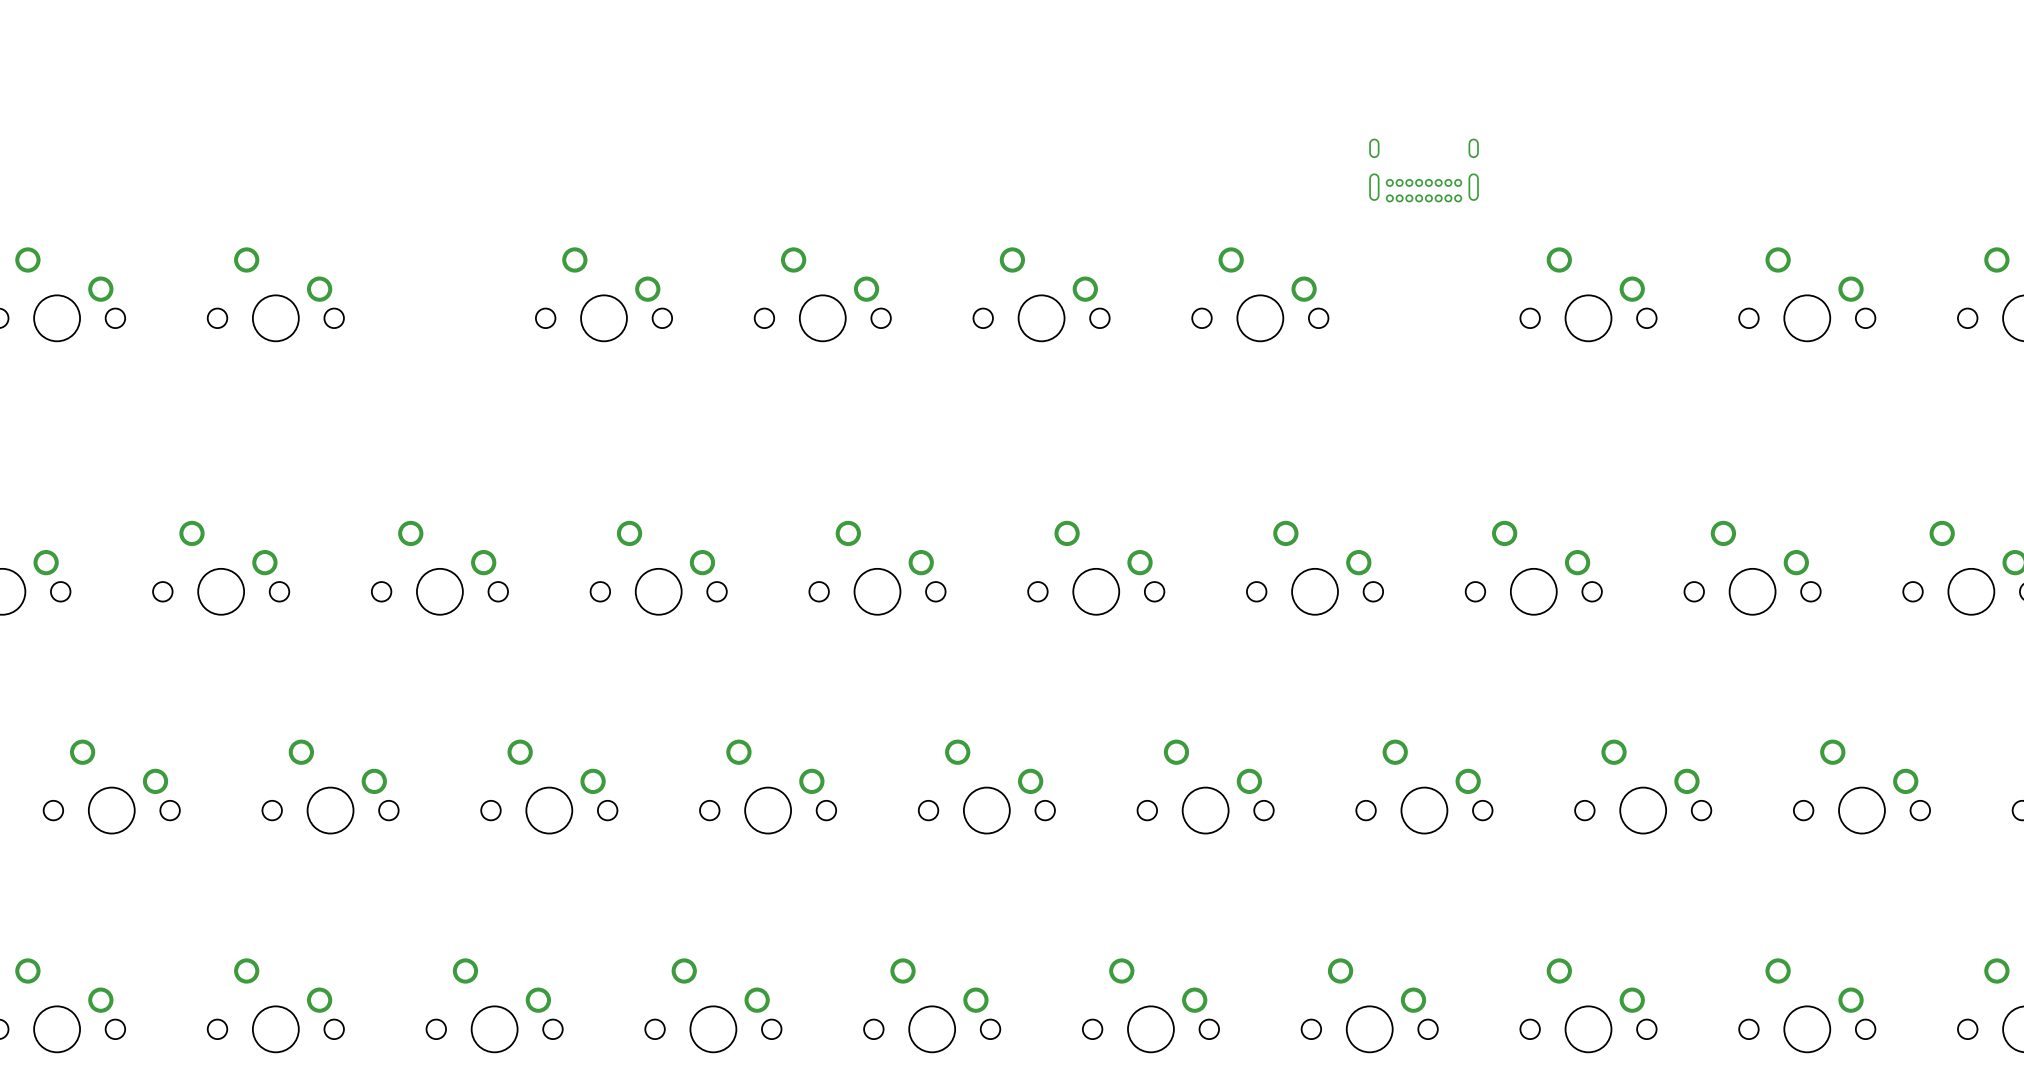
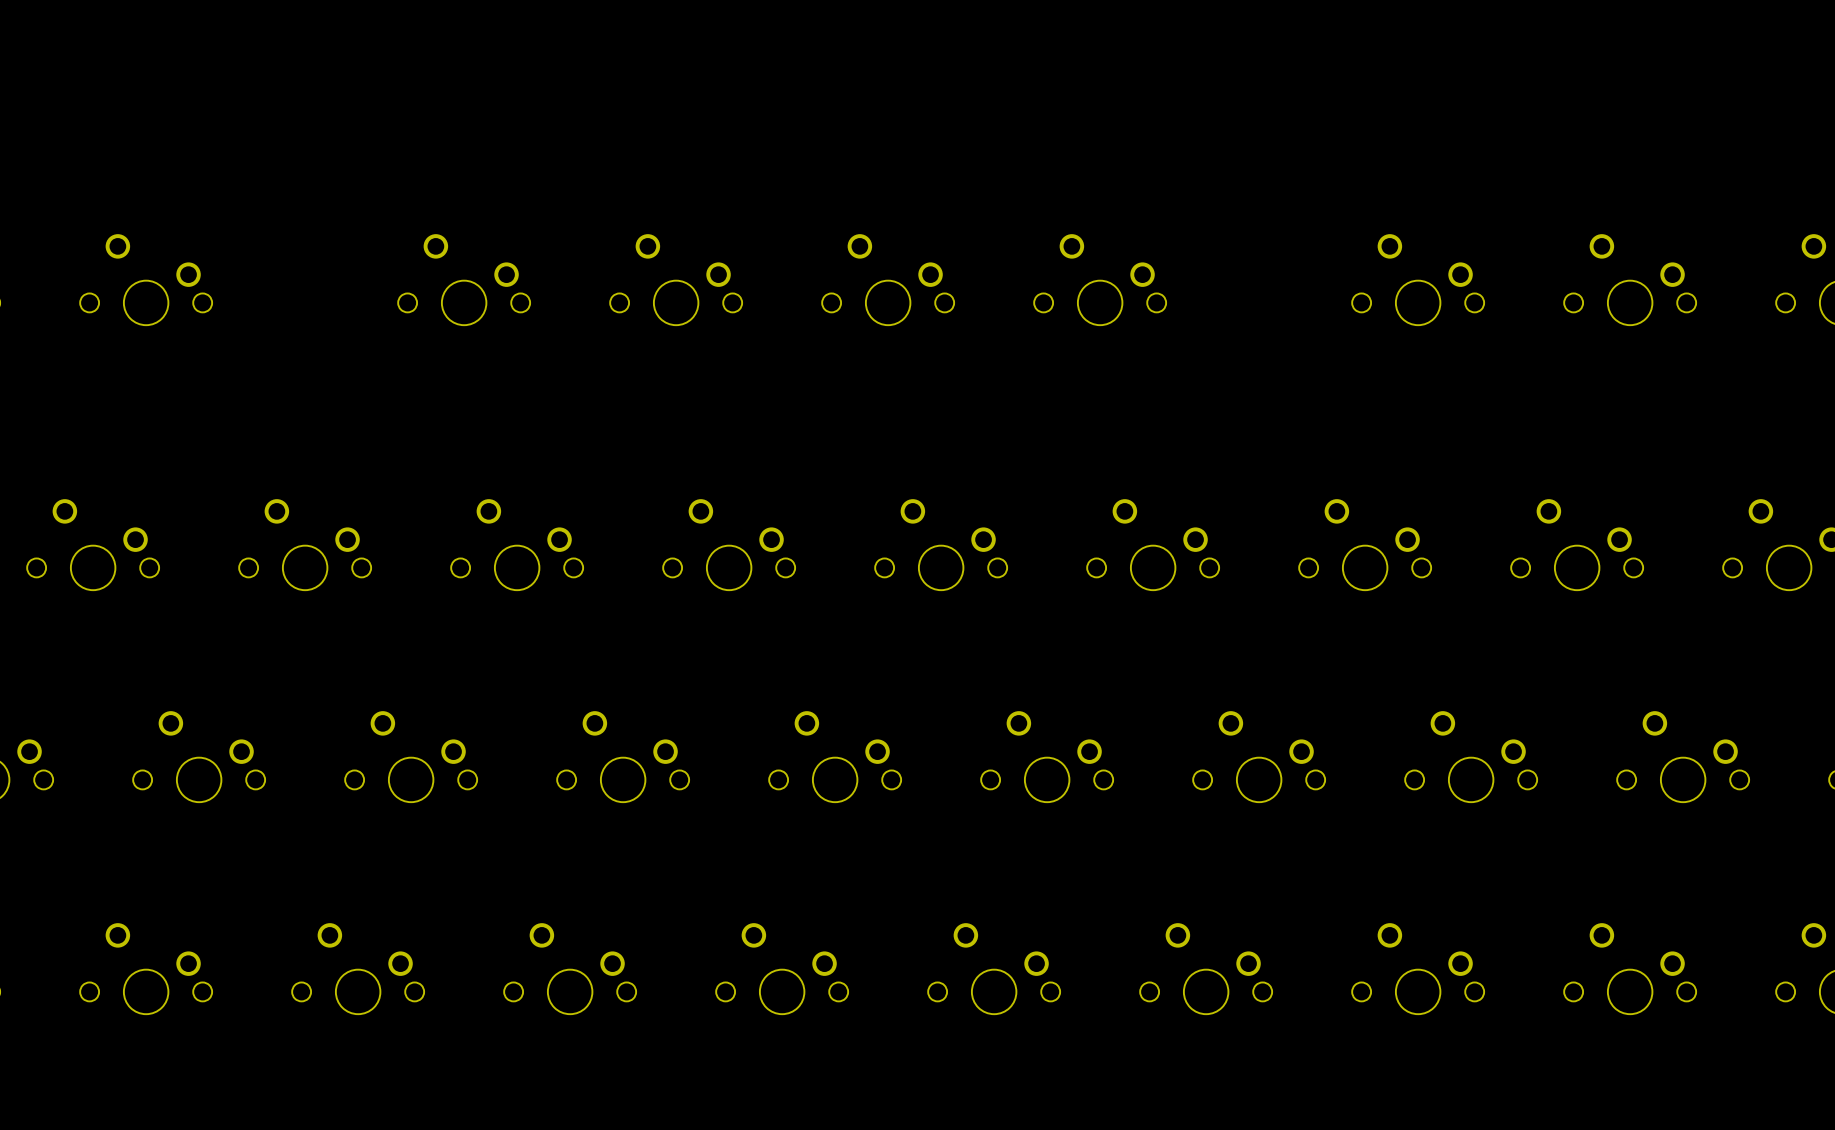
part: (1424, 170) -> none

